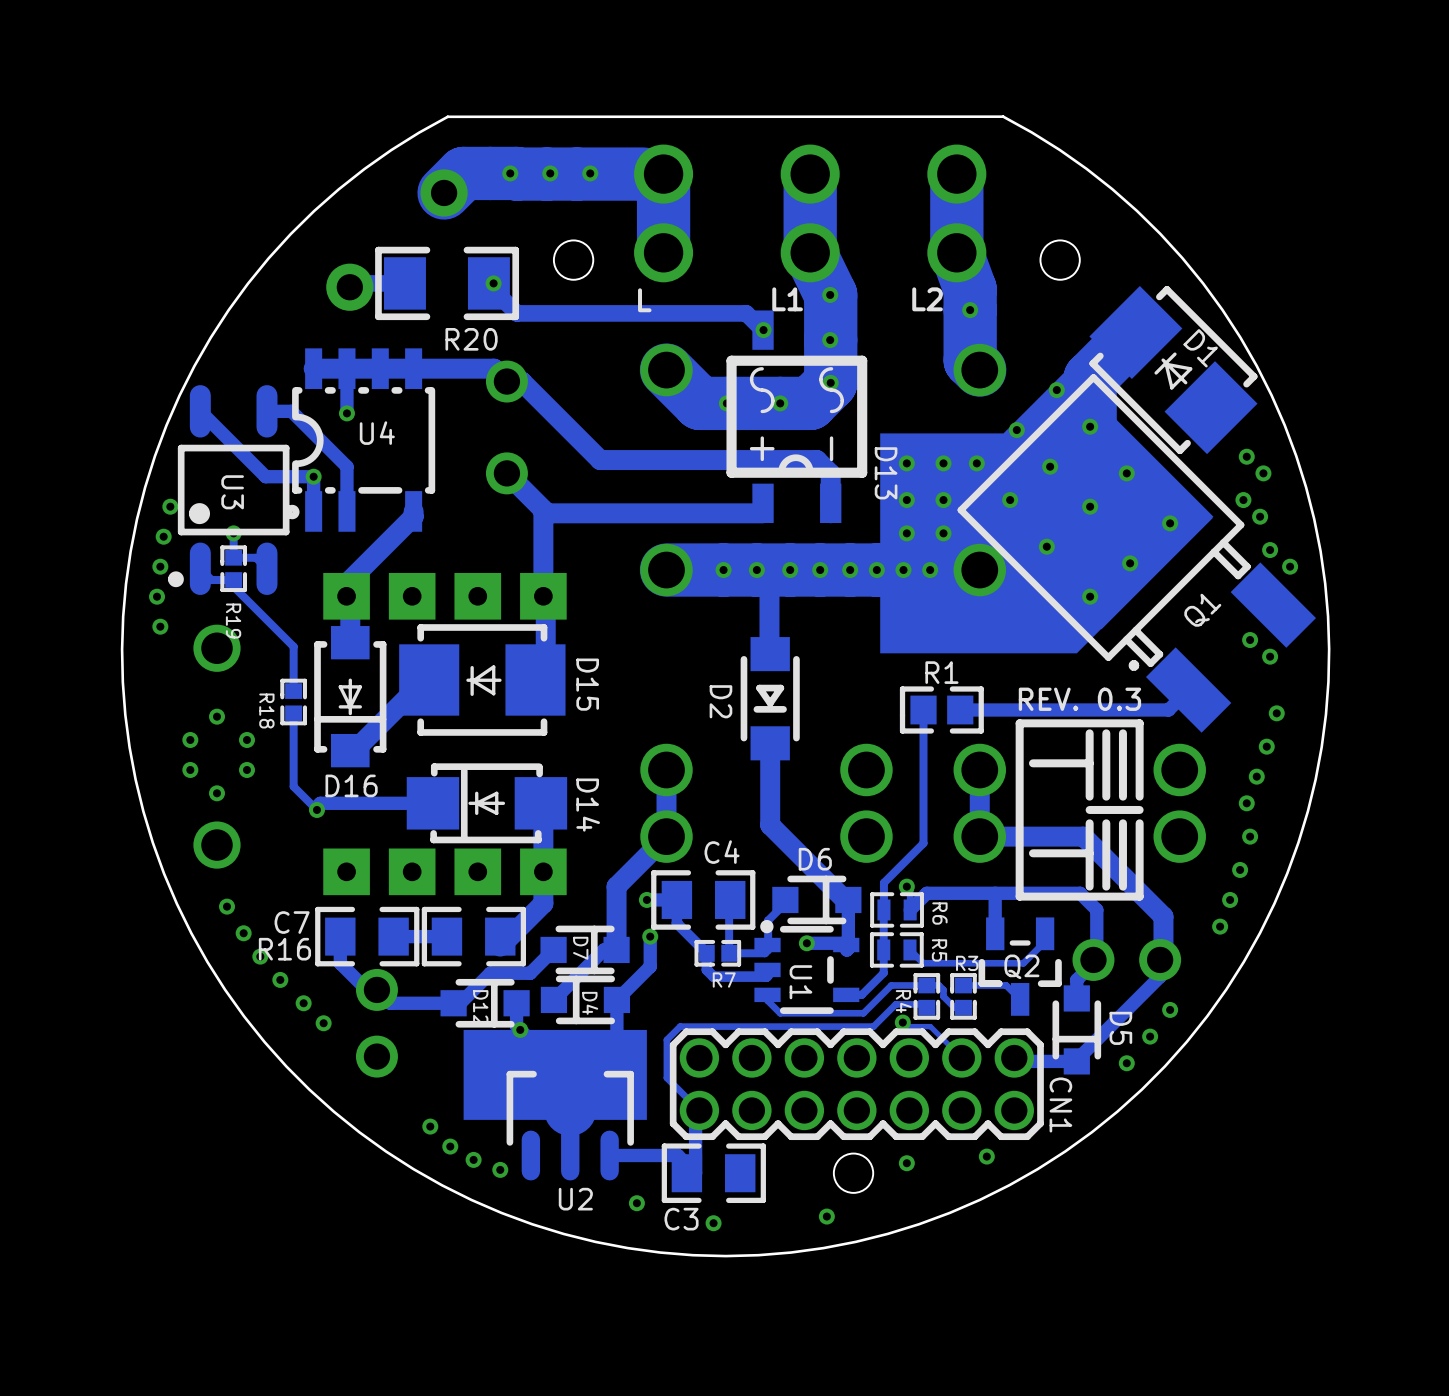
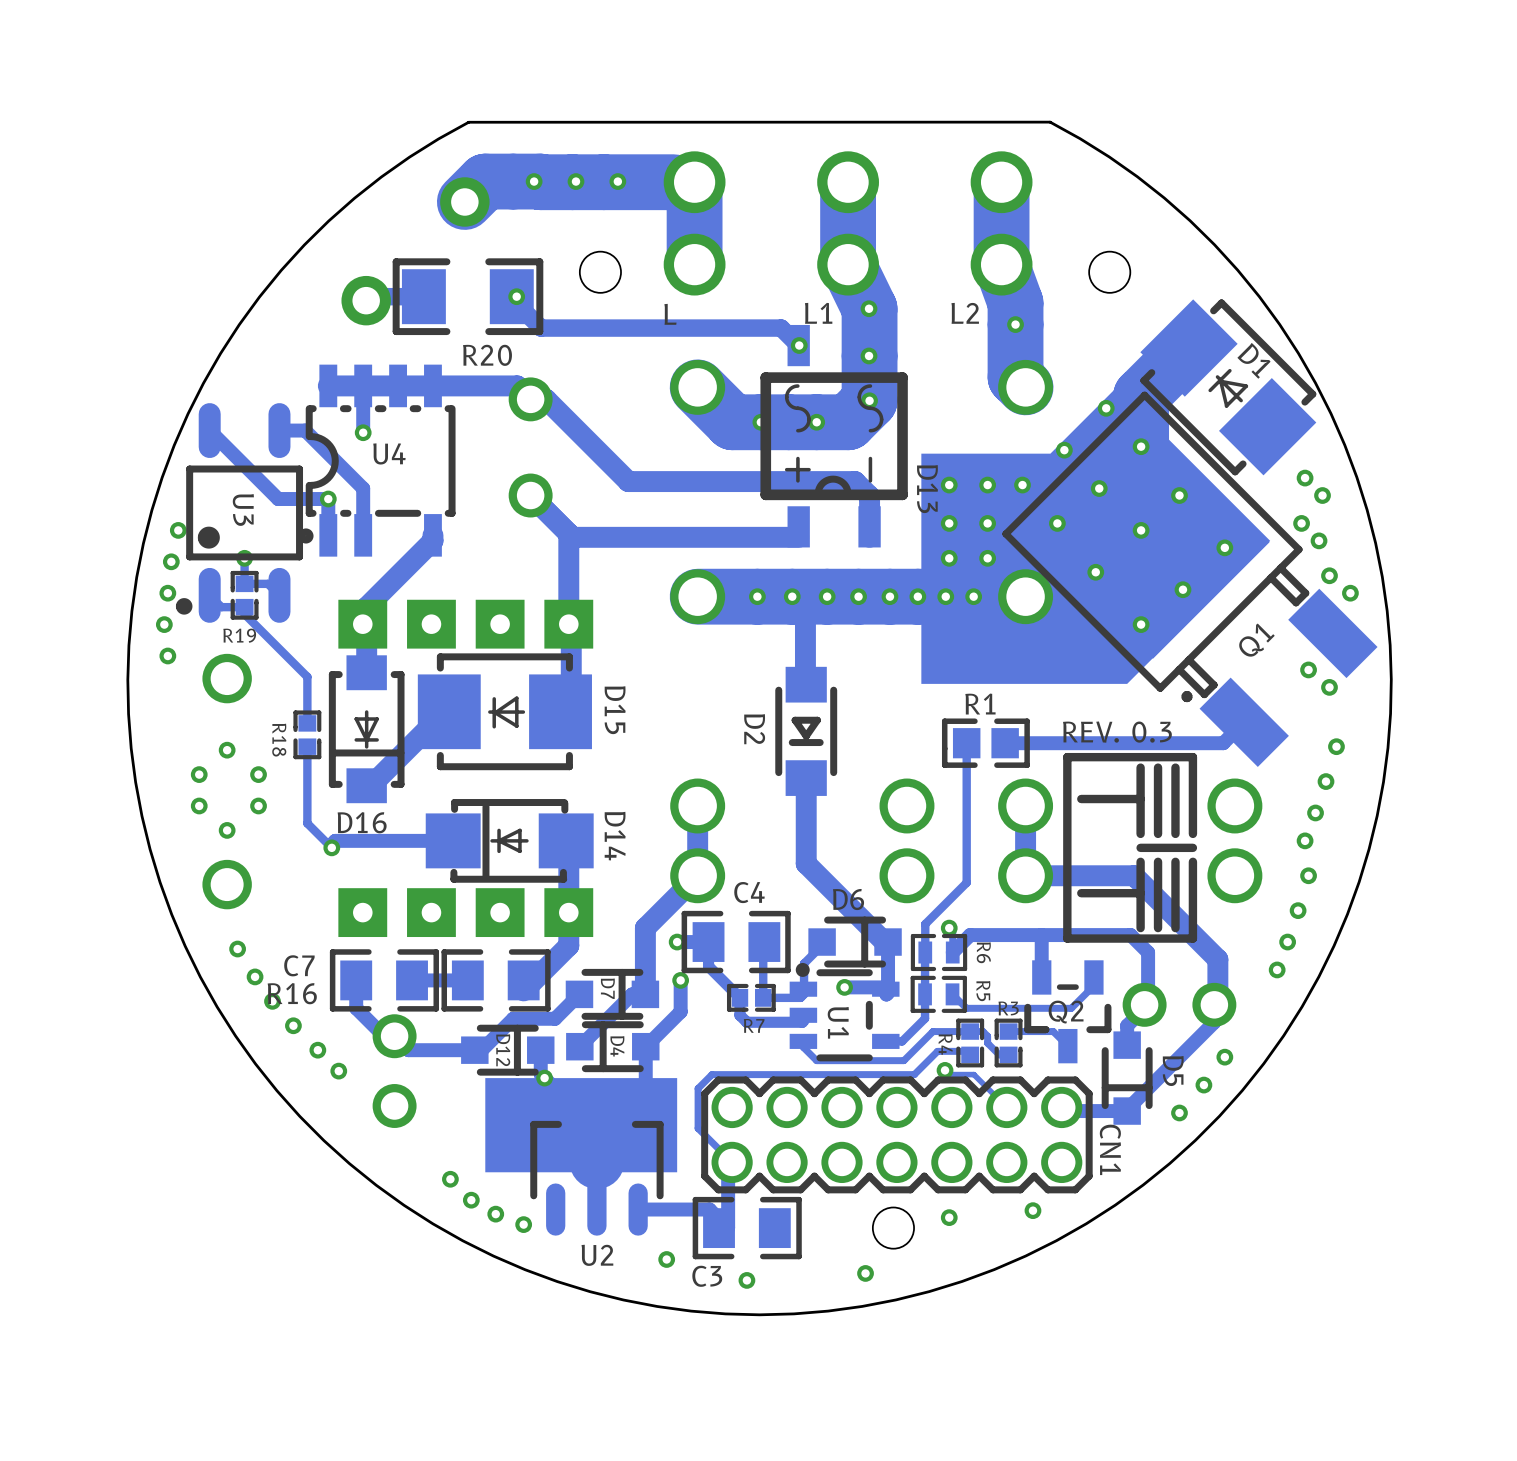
R19 name rotation: 0° (233, 621) -> 90° counterclockwise (239, 635)

